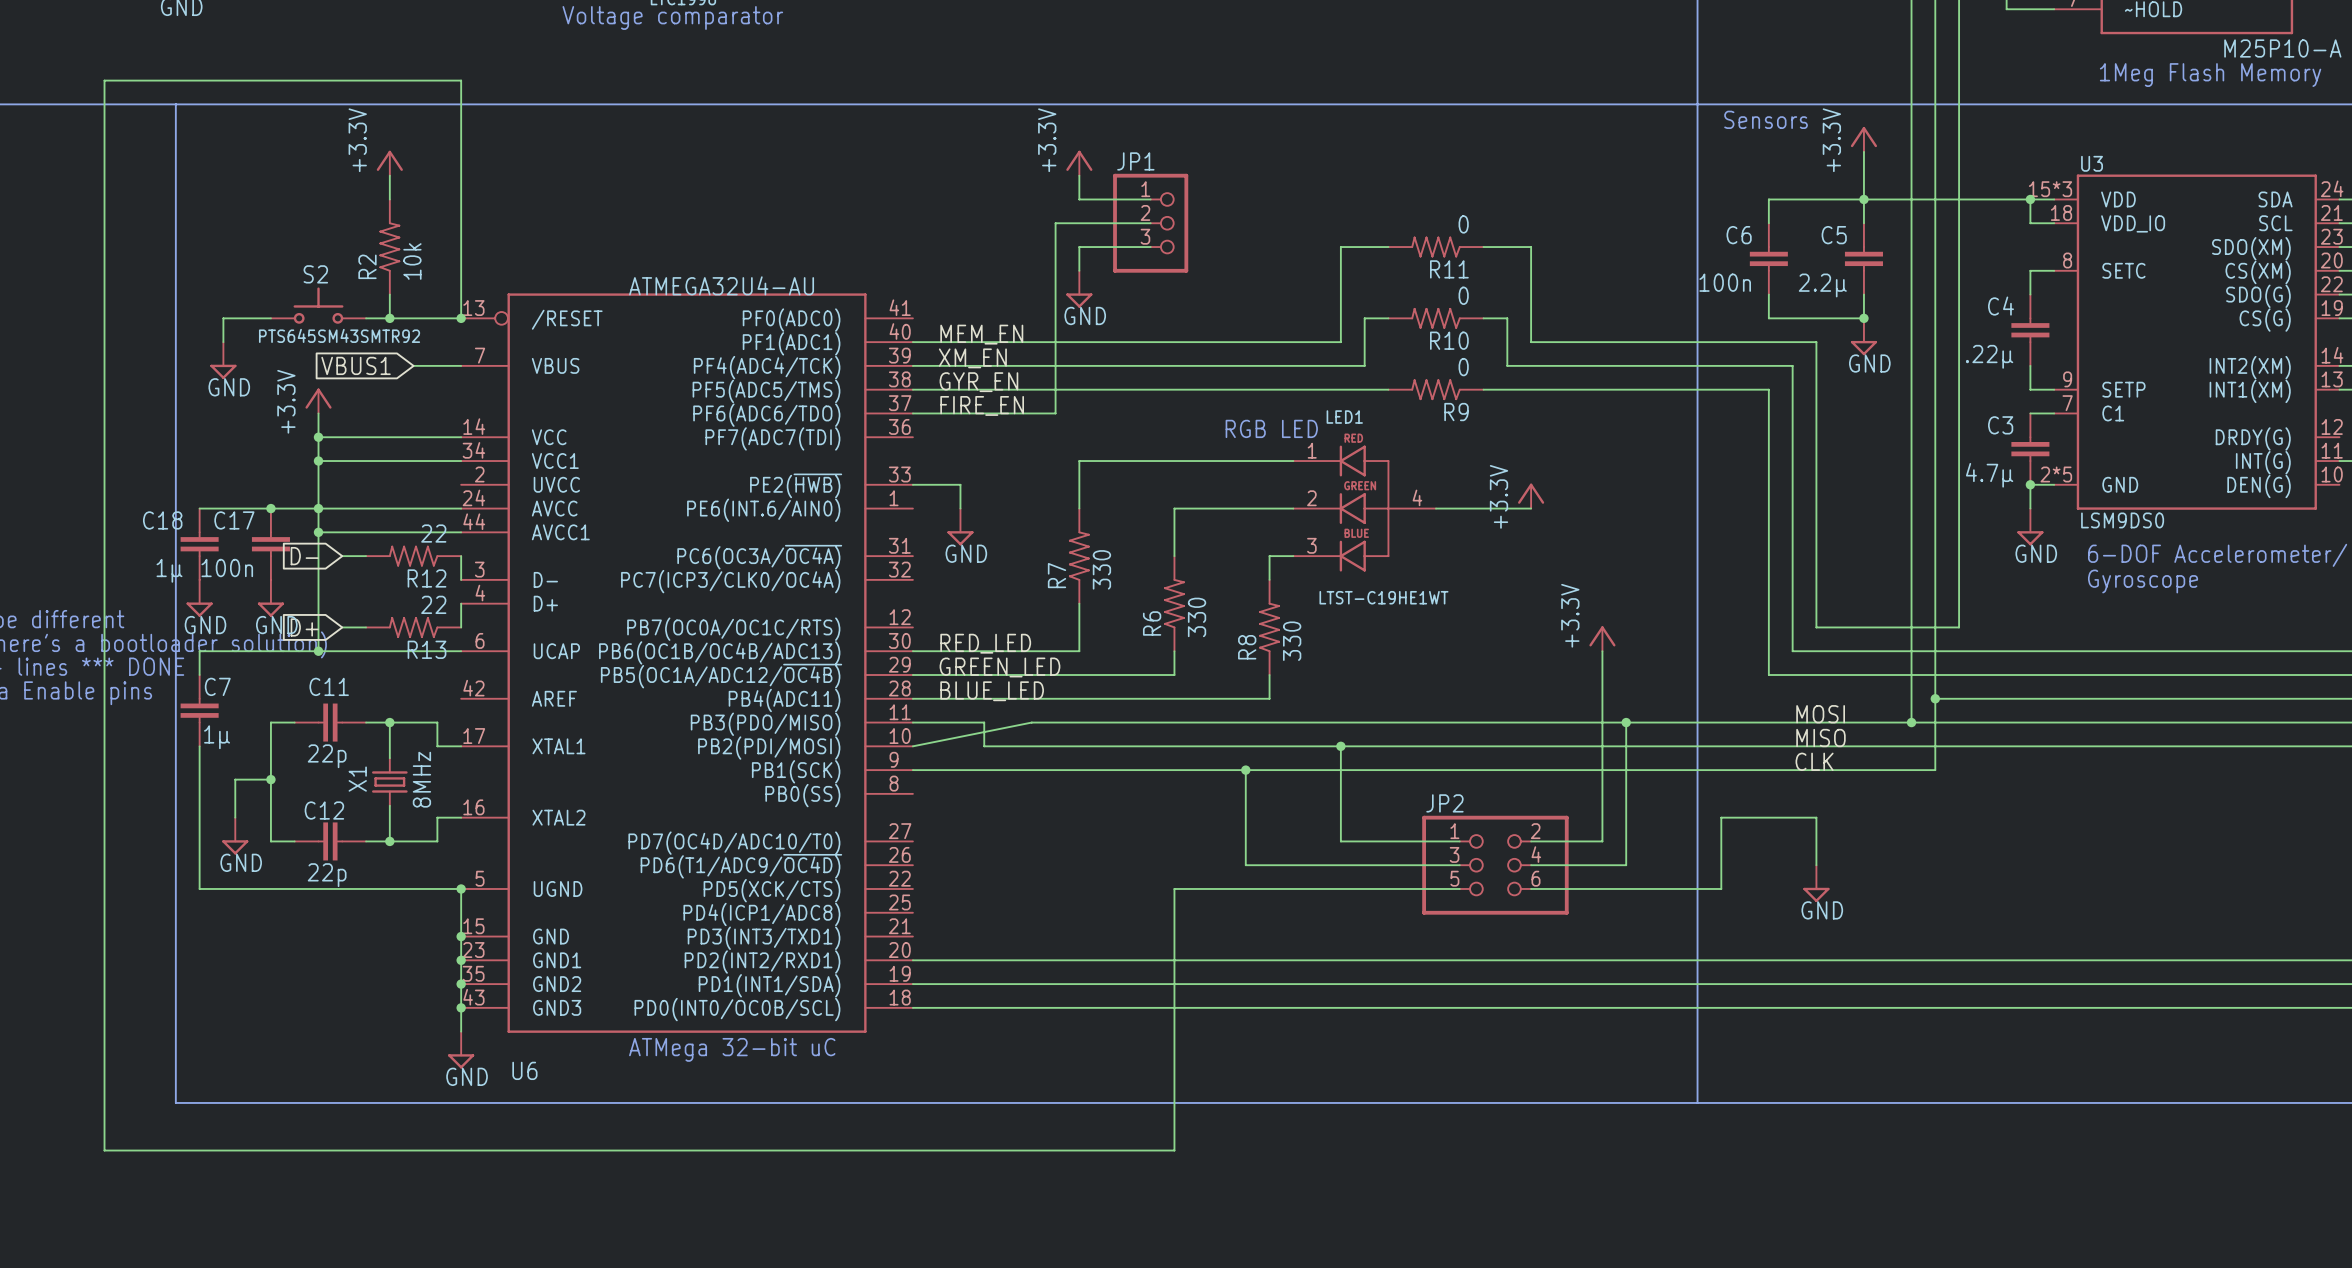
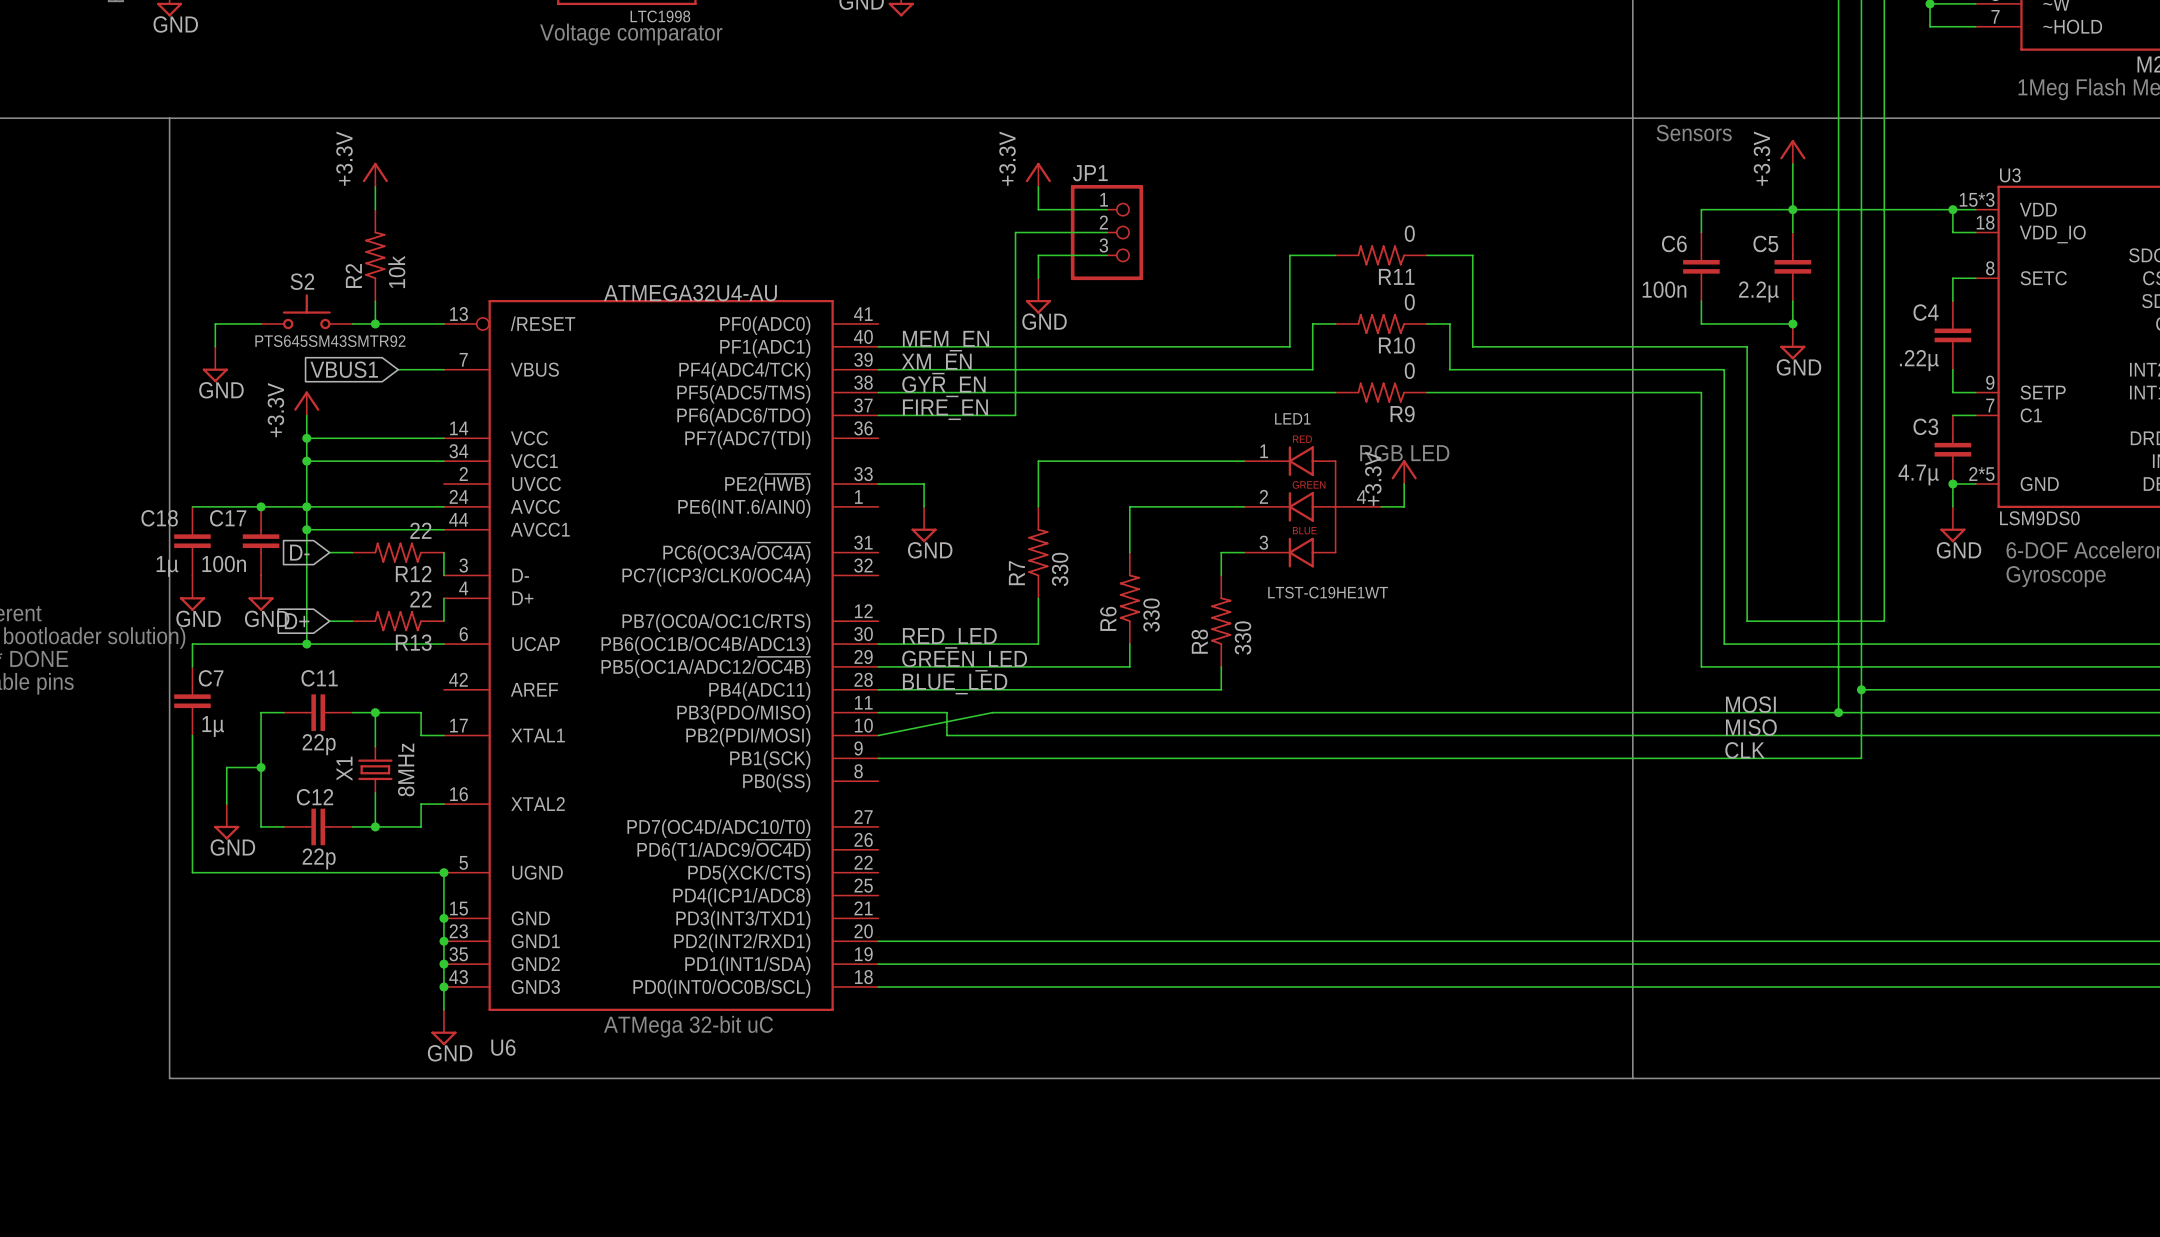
wire: (461, 318) (461, 80) (104, 80) (104, 1150) (1174, 1150) (1174, 888) (1459, 888) -> none
junction: (461, 318) -> none
text position: RGB LED (1271, 428) -> RGB LED (1404, 453)
power symbol position: +3.3V (1531, 496) -> +3.3V (1404, 472)
wire: (1459, 508) (1531, 508) -> (1404, 506) (1404, 484)
power symbol: +3.3V (1602, 638) -> none
wire: (1602, 651) (1602, 841) (1531, 841) -> none
wire: (1626, 722) (1626, 865) (1531, 865) -> none
junction: (1626, 722) -> none
wire: (1340, 746) (1340, 841) (1459, 841) -> none
junction: (1340, 746) -> none
wire: (1245, 770) (1245, 865) (1459, 865) -> none
junction: (1245, 770) -> none
JP2: (1495, 865) -> none
wire: (1816, 865) (1816, 817) (1721, 817) (1721, 888) (1531, 888) -> none
power symbol: GND (1816, 883) -> none

